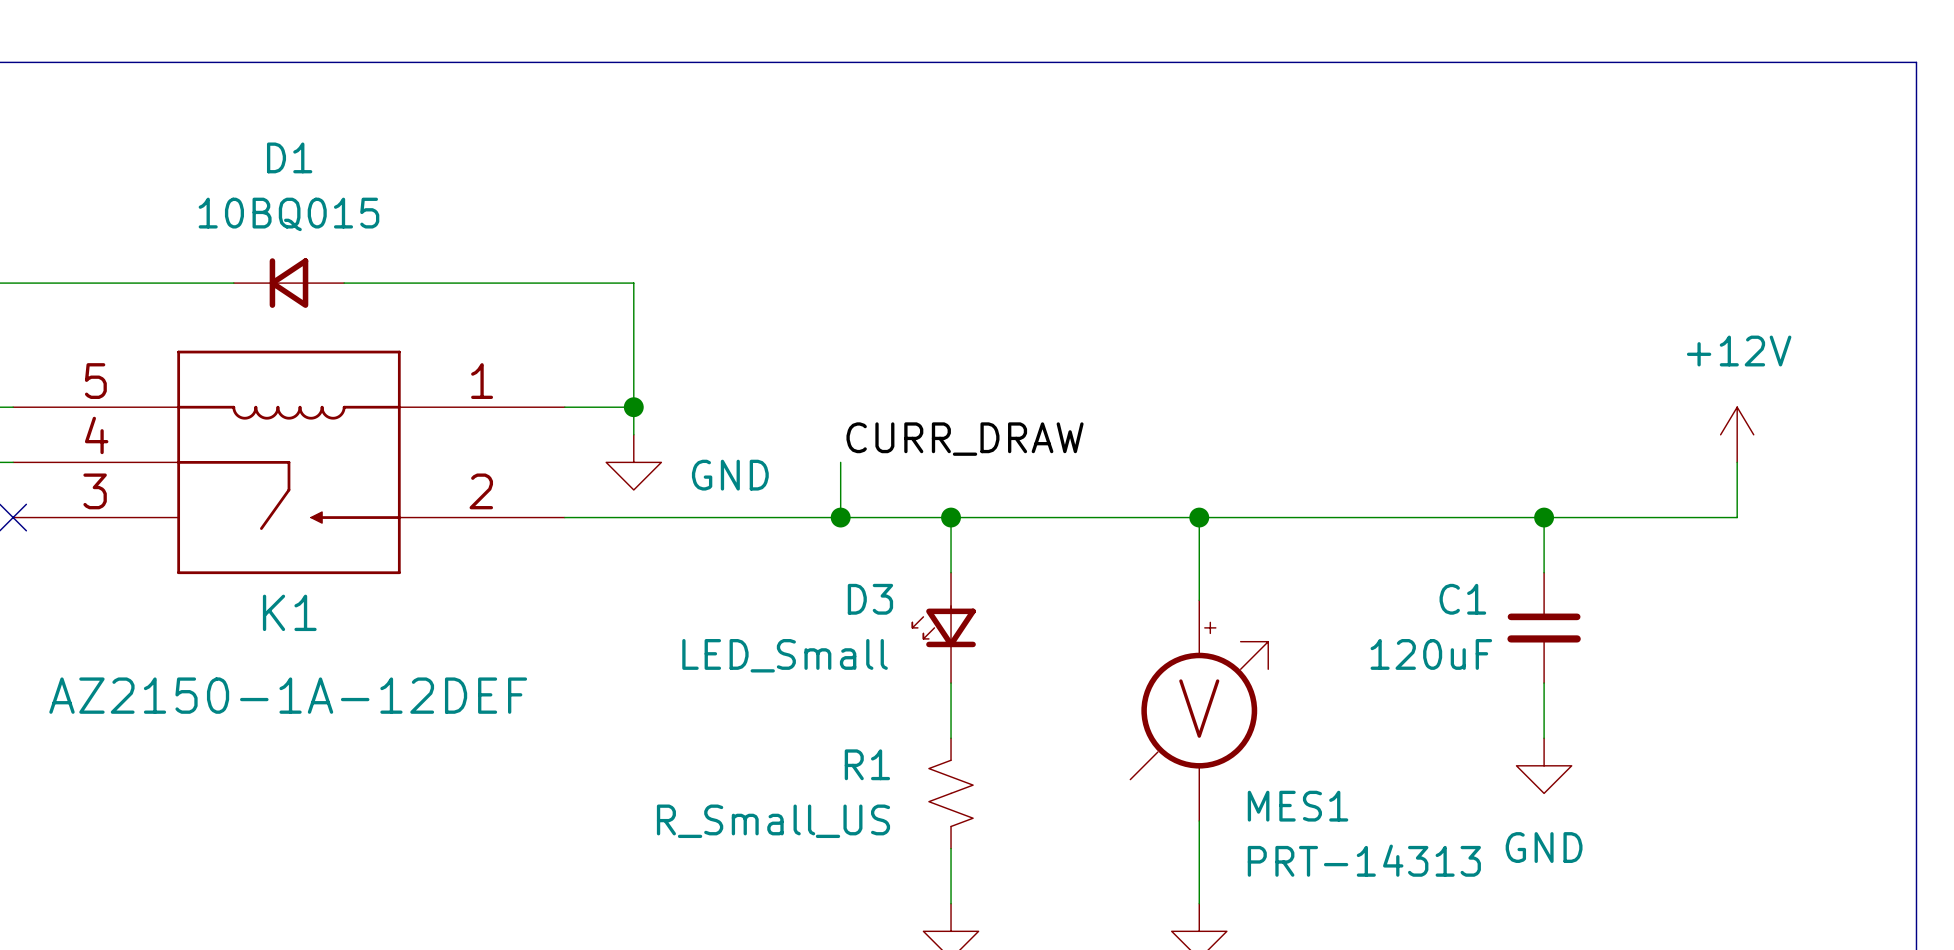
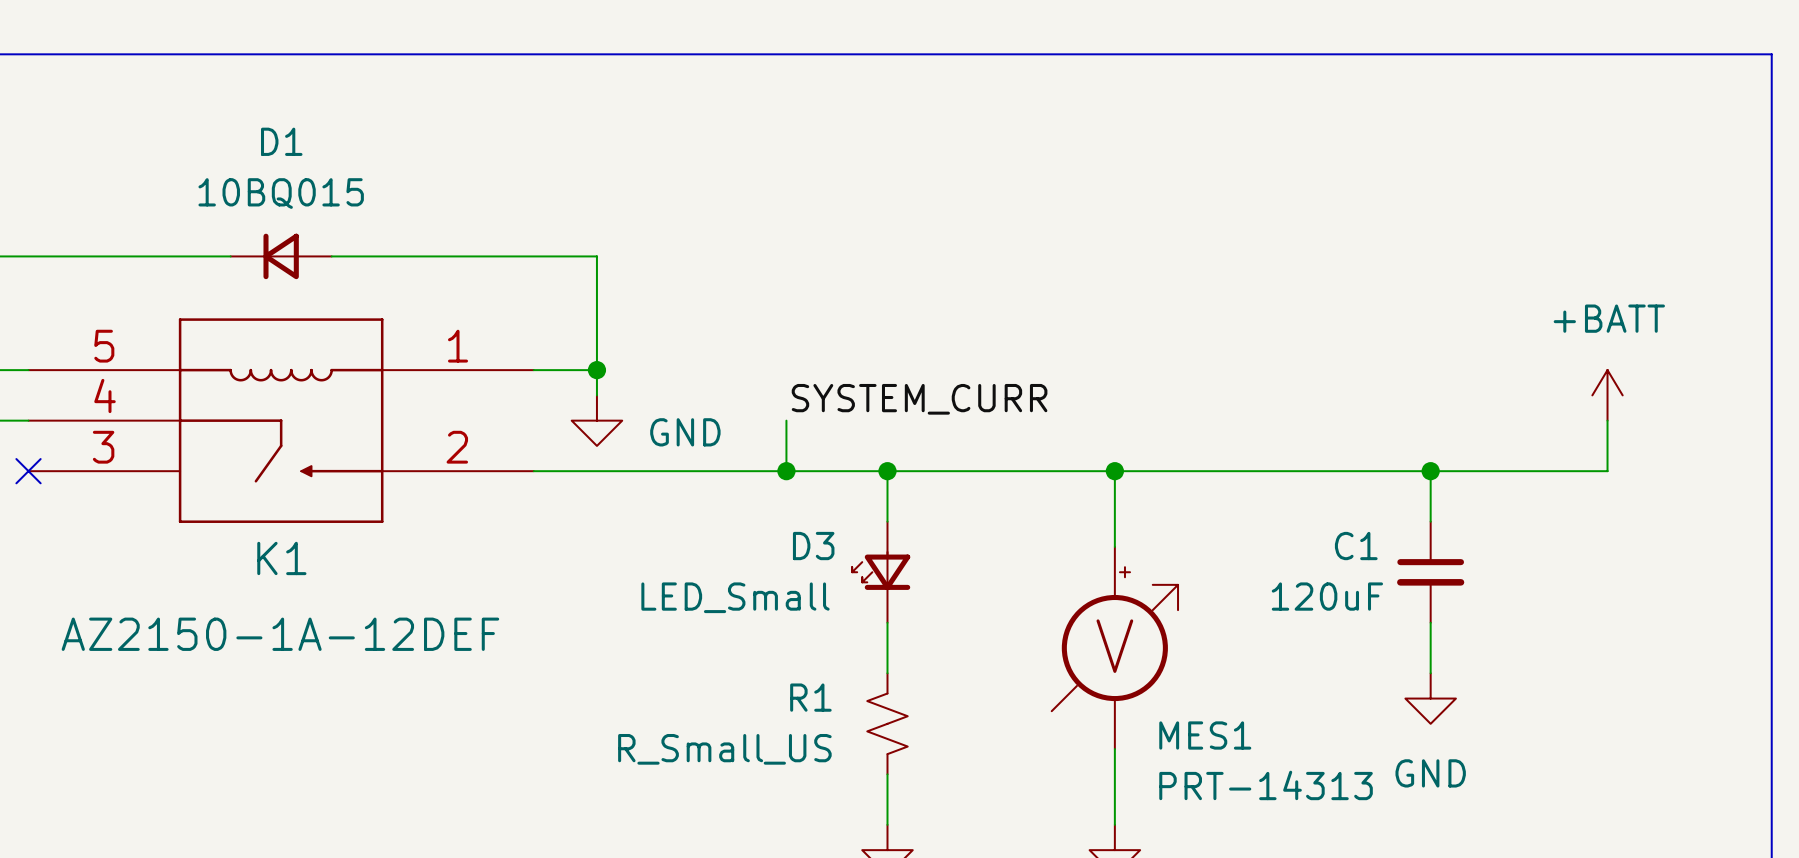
power symbol: +12V (1737, 434) -> +BATT (1607, 395)
label: CURR_DRAW (965, 439) -> SYSTEM_CURR (919, 399)

